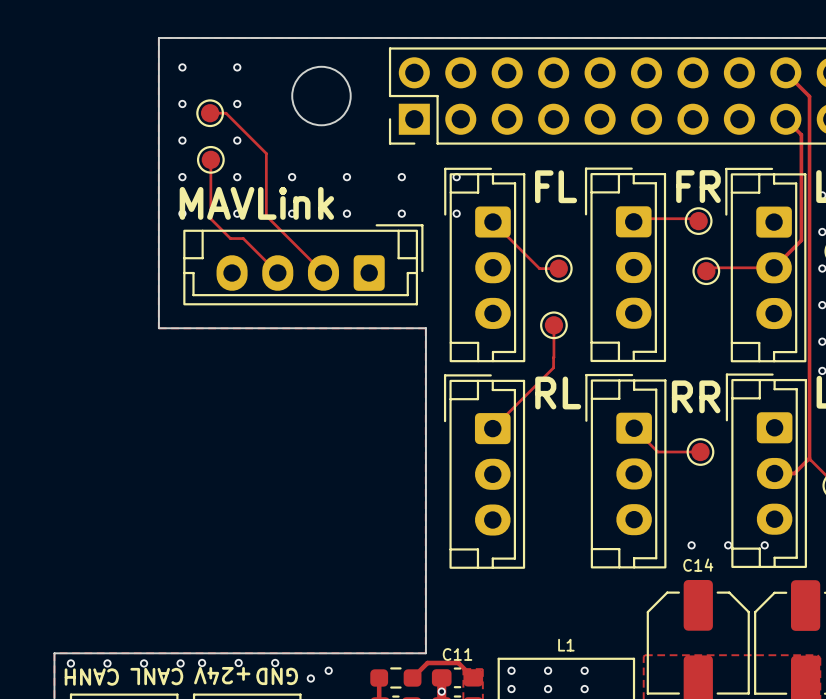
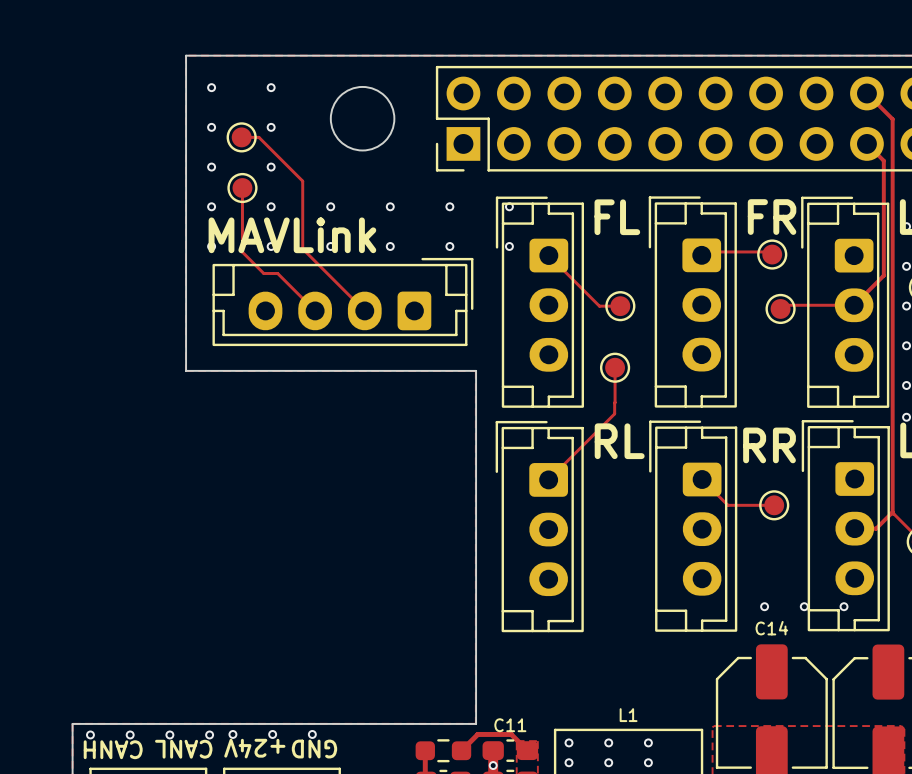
via: (328, 670) -> none
via: (310, 678) -> none

